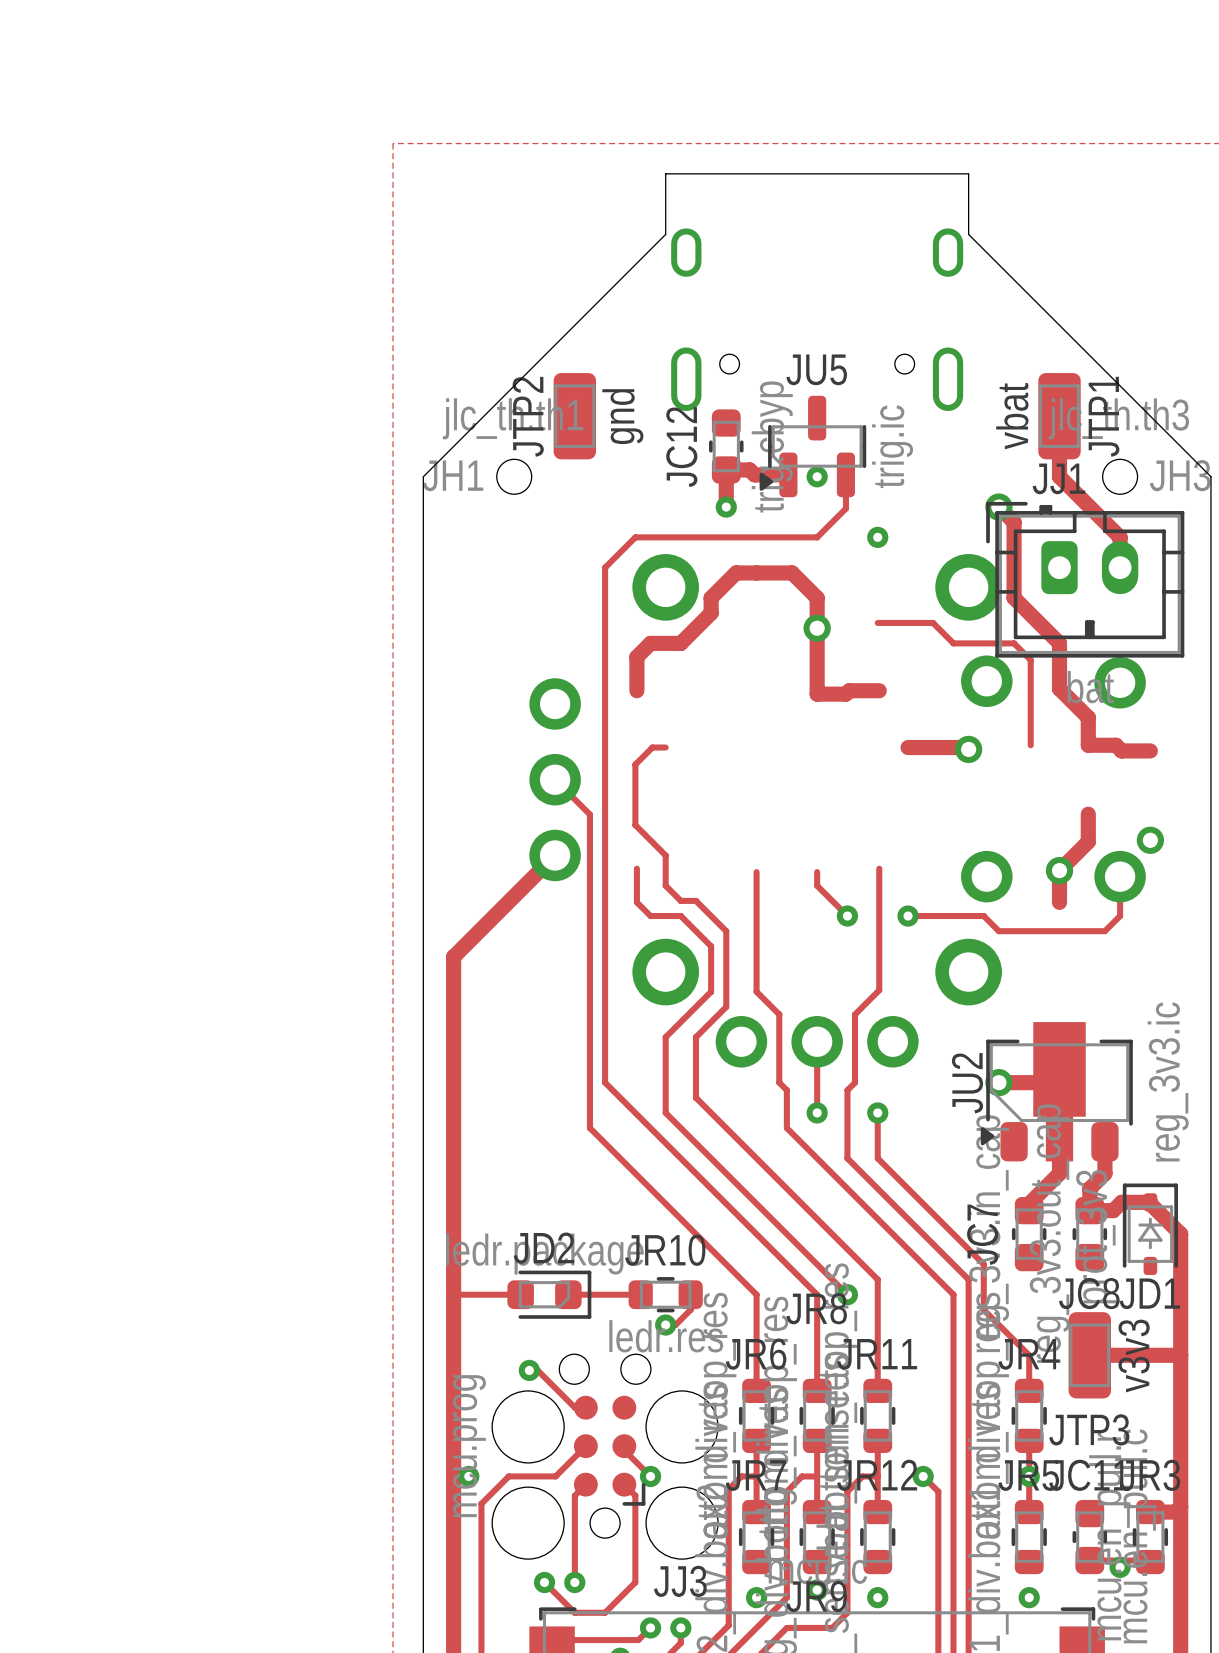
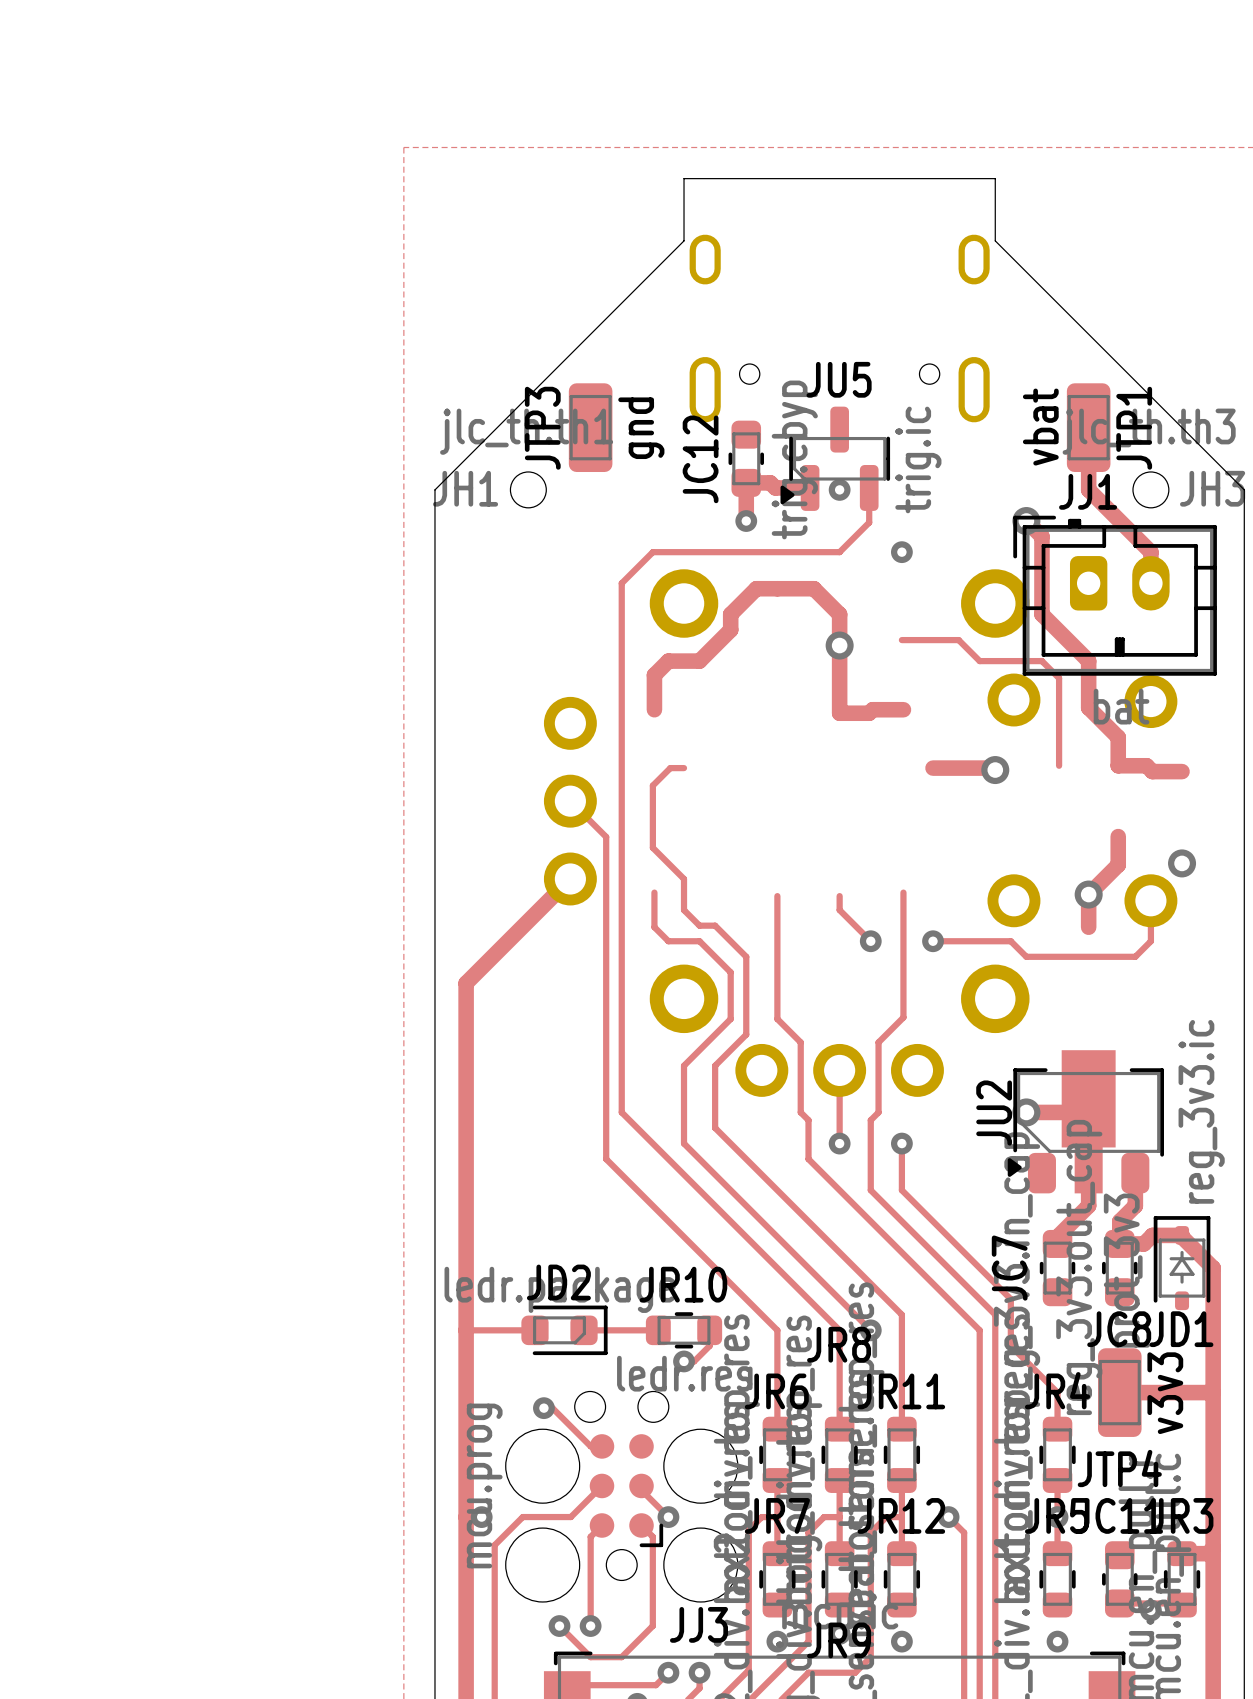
JTP2 name: JTP2 (528, 416) -> JTP3 (542, 428)
JTP3 name: JTP3 (1089, 1429) -> JTP4 (1119, 1468)

